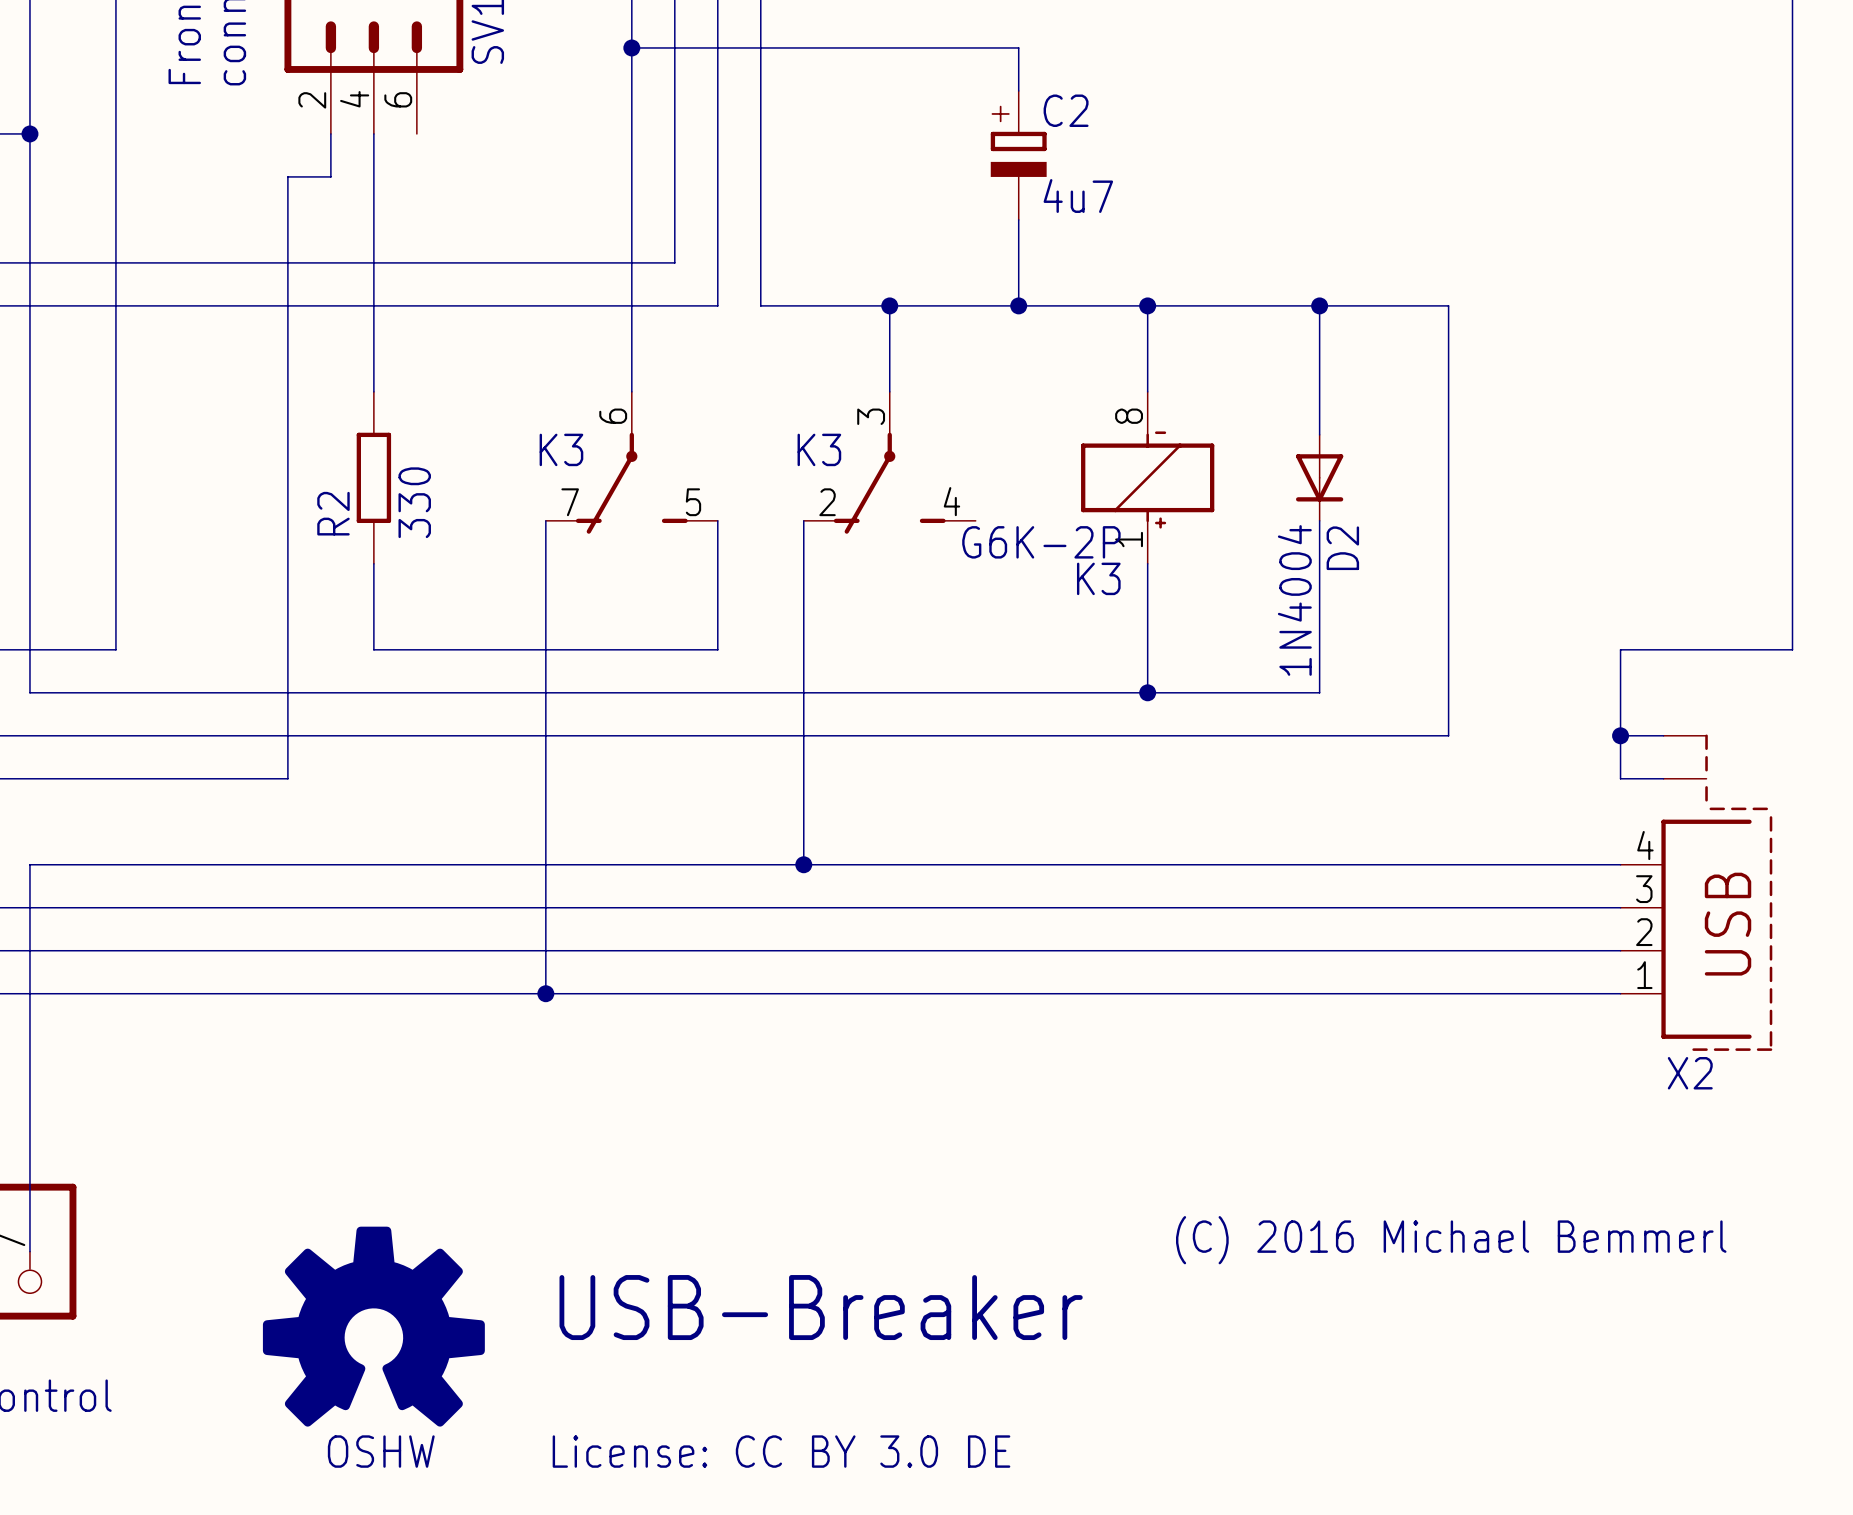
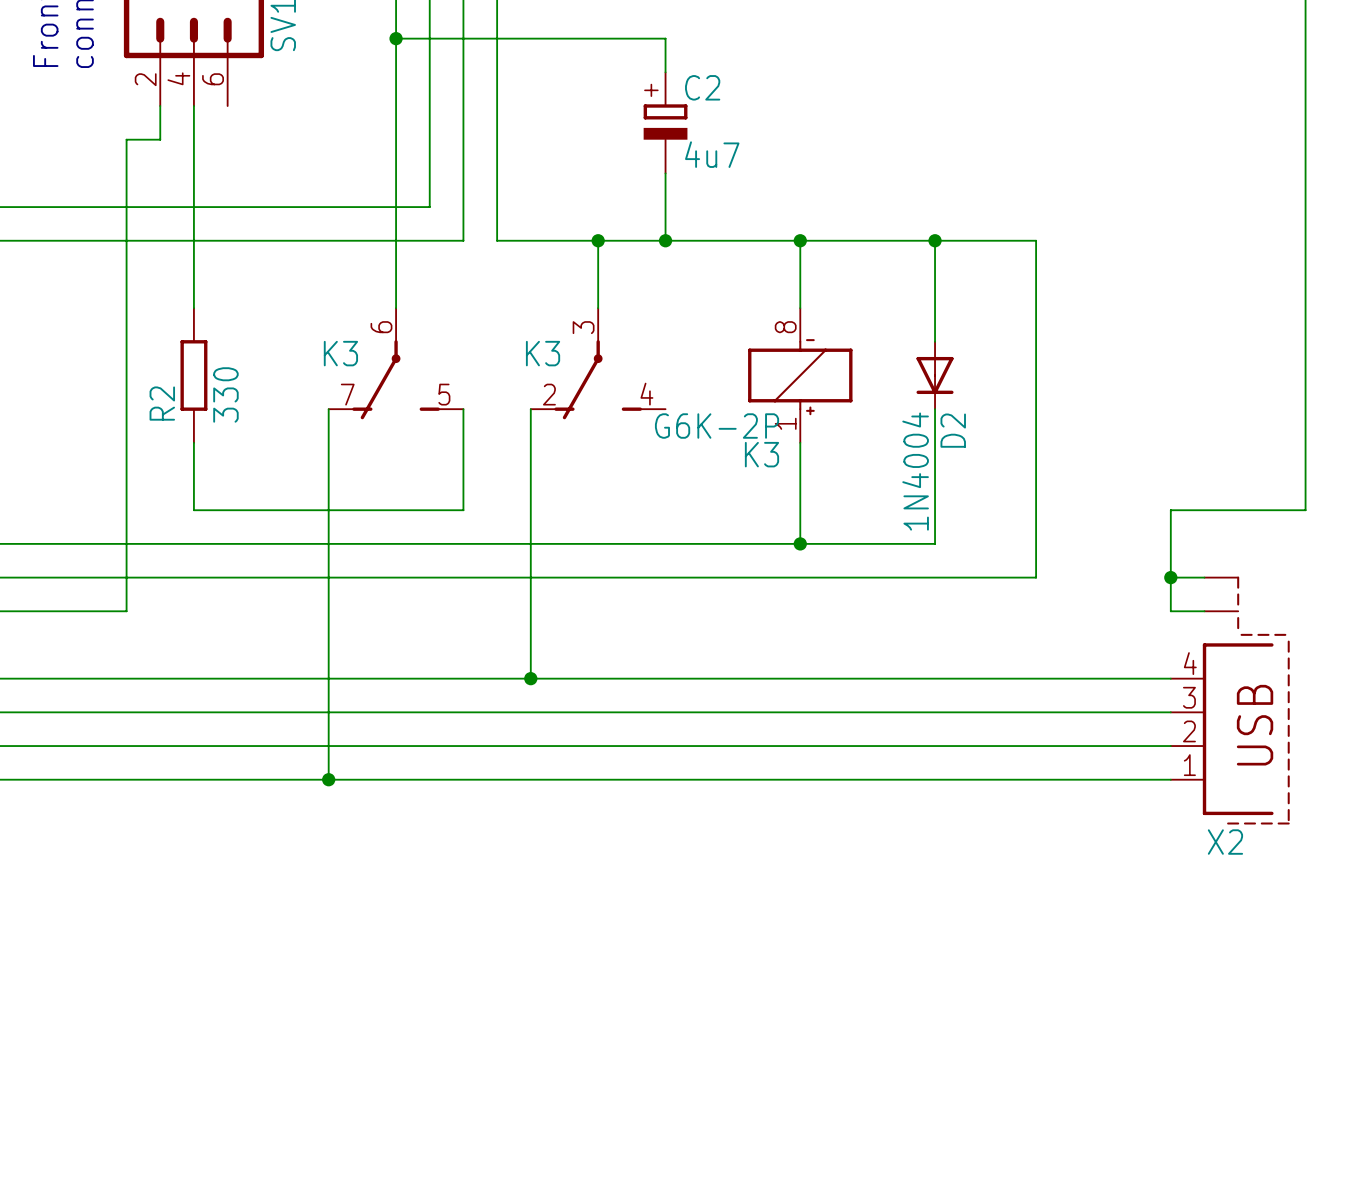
wire: (975, 47) (1018, 47) (1018, 90) -> (665, 38) (665, 72)
C2 position: (1018, 155) -> (665, 122)
wire: (1018, 219) (1018, 305) -> (665, 173) (665, 240)
junction position: (1018, 305) -> (665, 240)
drawing: [262, 1226, 485, 1427] -> none
text: (C) 2016 Michael Bemmerl (1451, 1240) -> none
text: USB-Breaker (821, 1307) -> none
text: OSHW (381, 1451) -> none
text: License: CC BY 3.0 DE (781, 1451) -> none

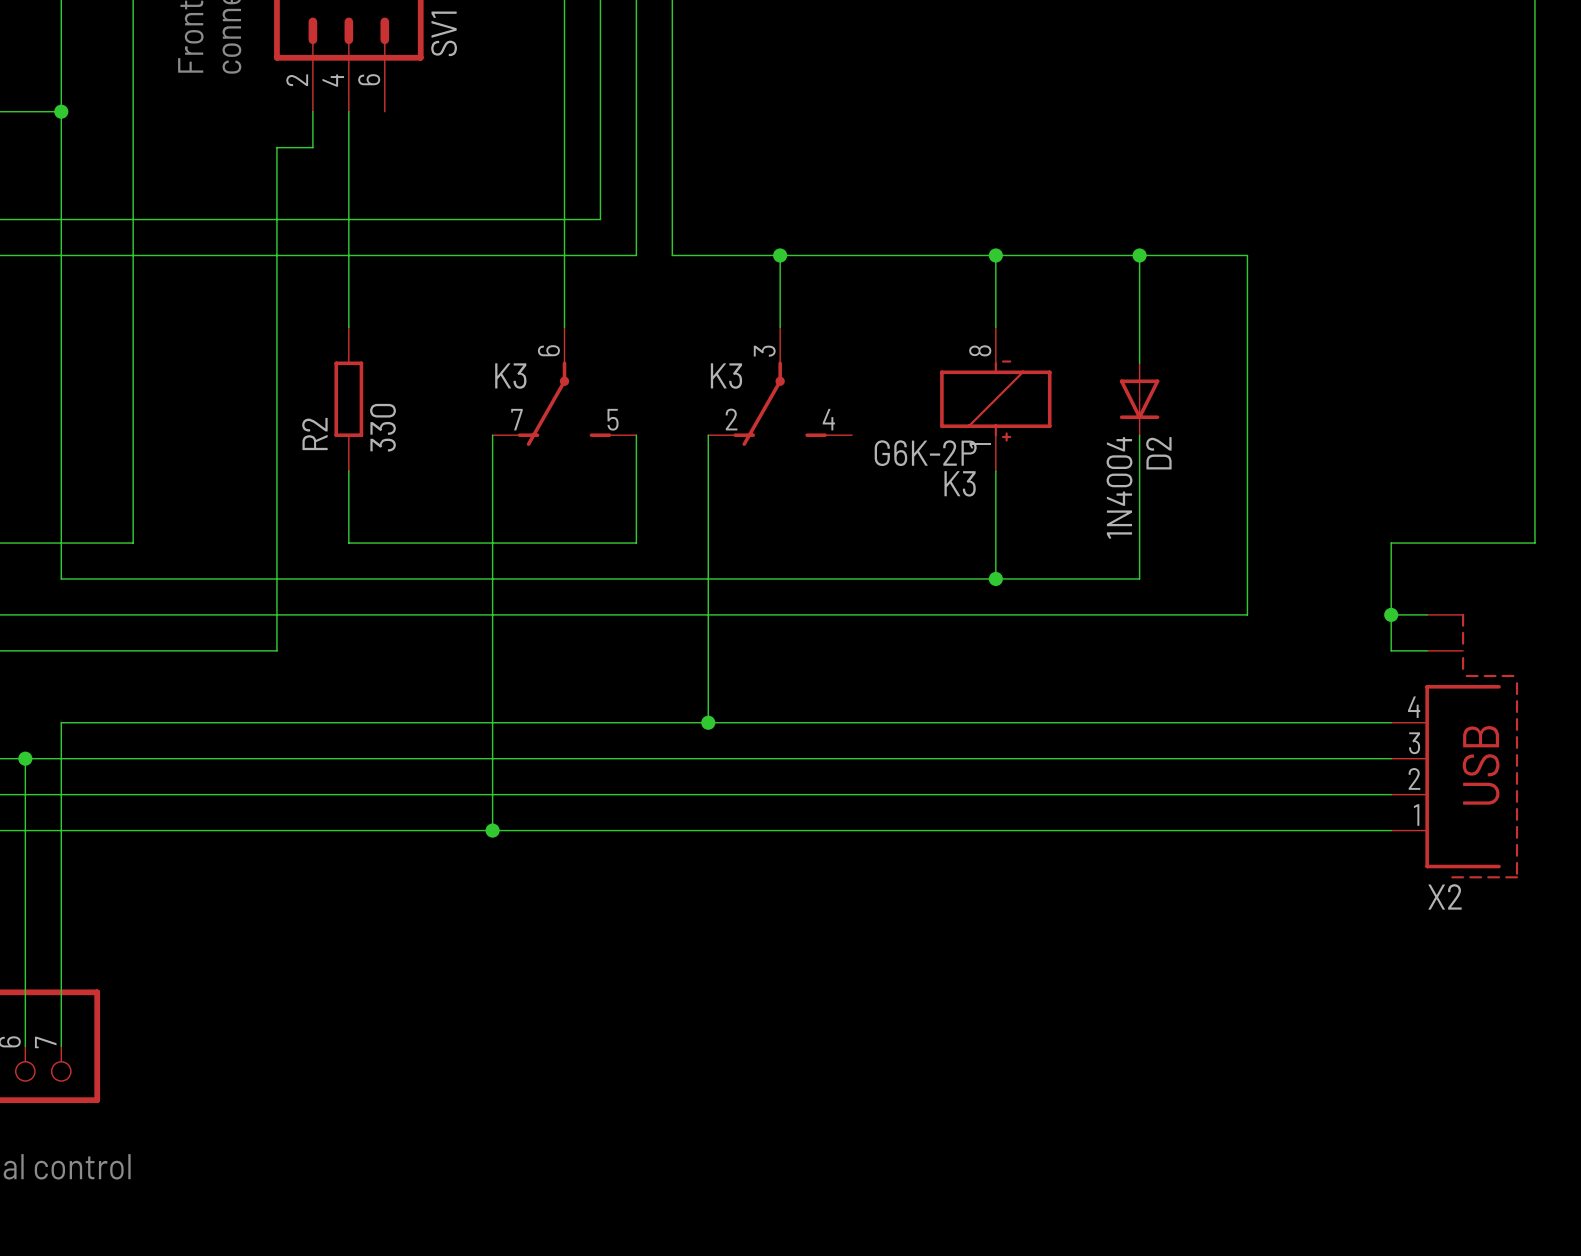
wire: (396, 38) (665, 38) (665, 72) -> none
junction: (396, 38) -> none
C2: 4u7 (665, 122) -> none
wire: (665, 173) (665, 240) -> none
junction: (665, 240) -> none

